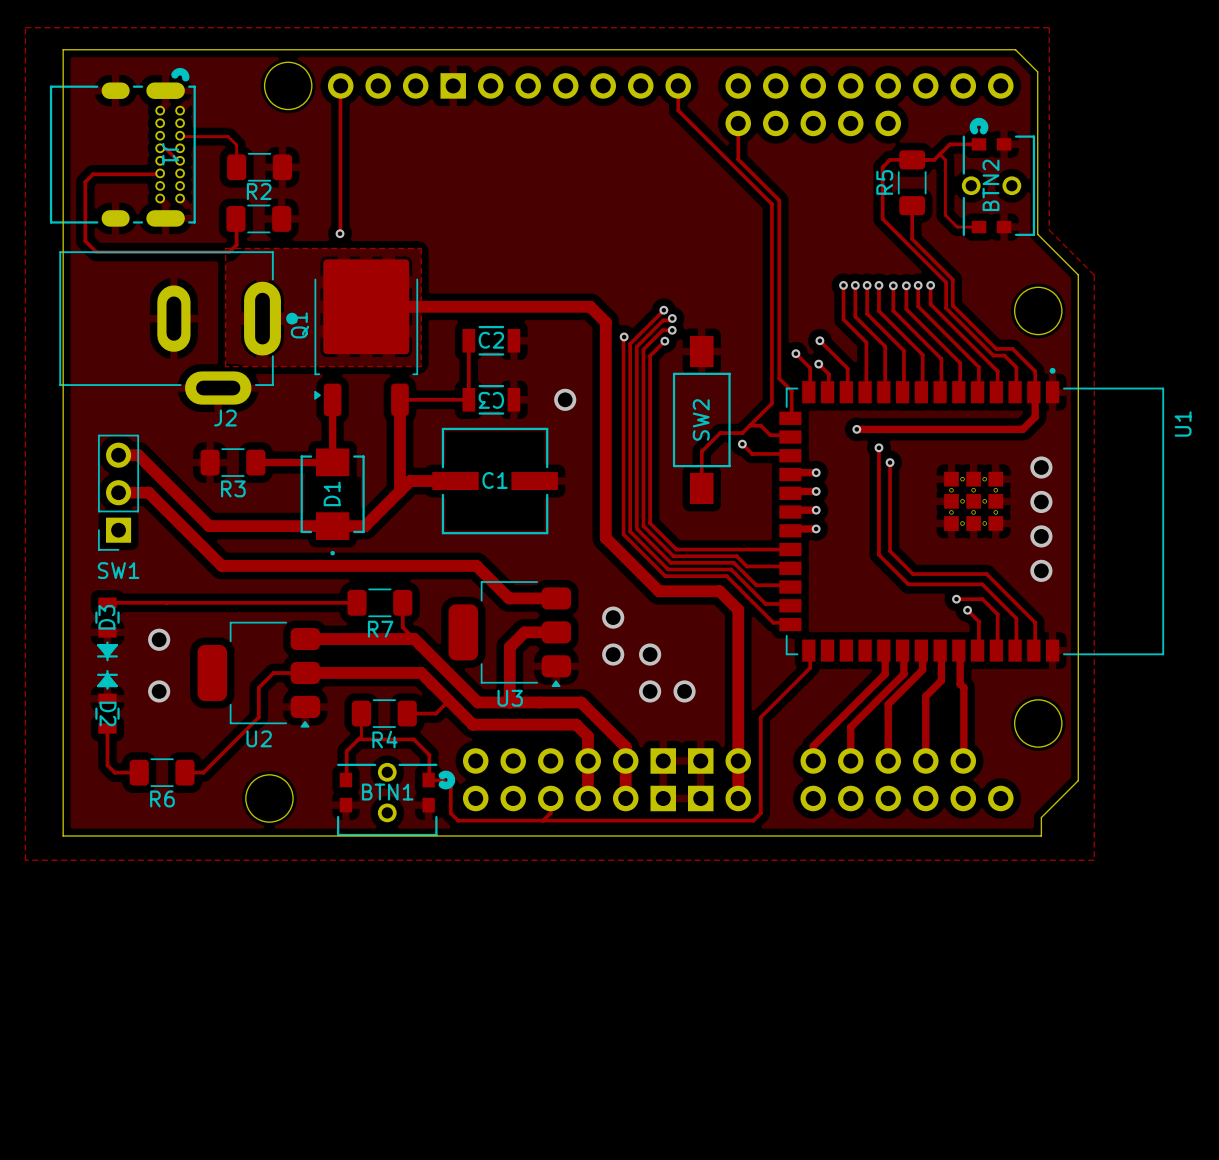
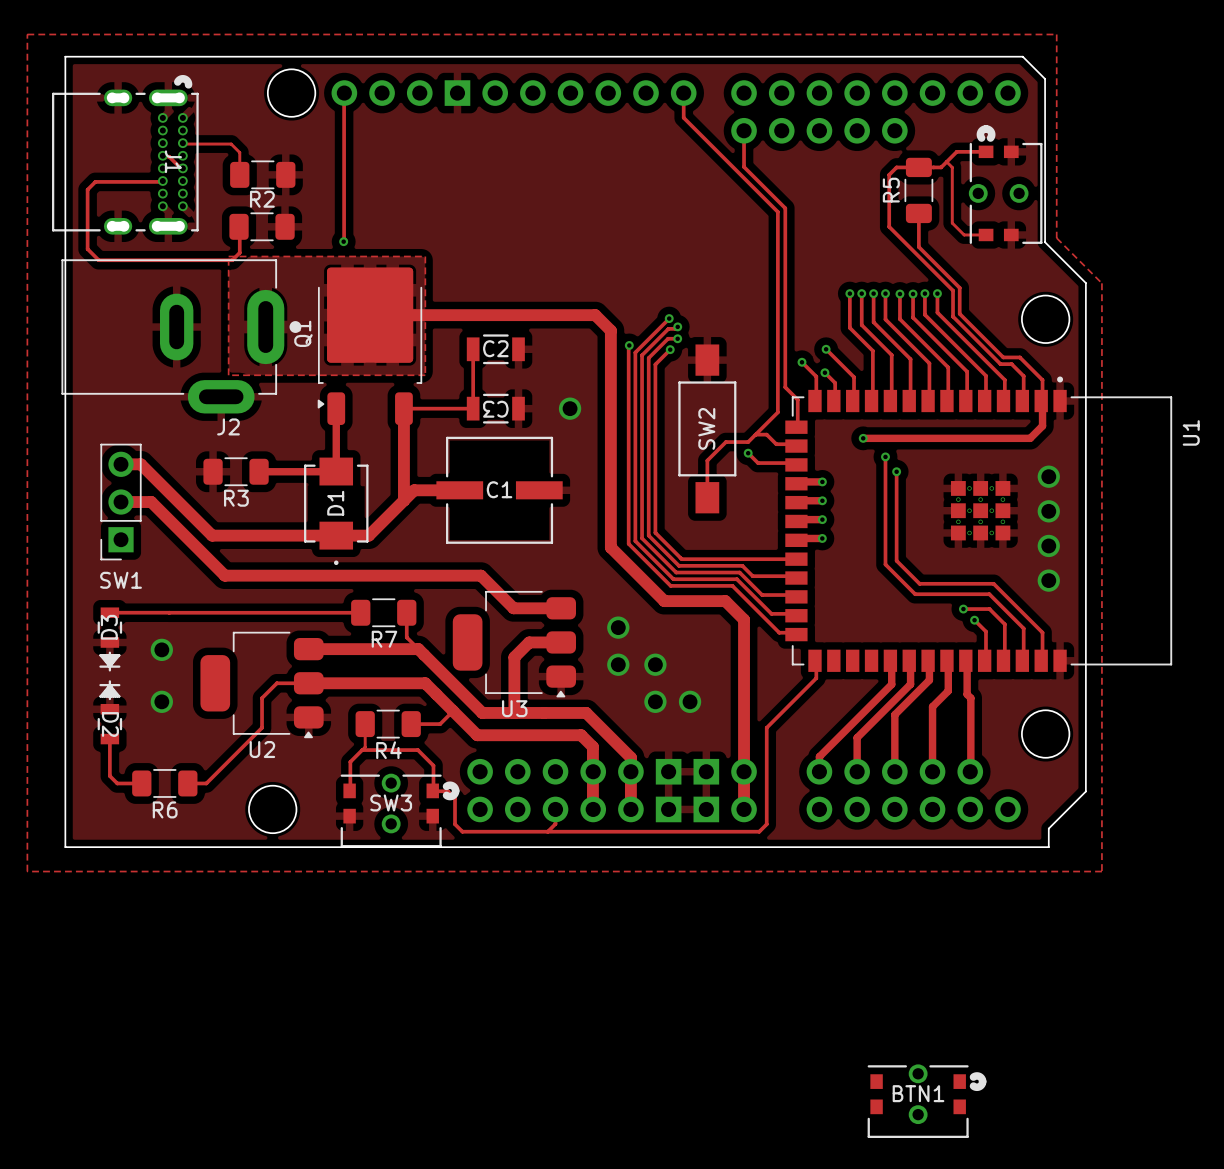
BTN2 name: BTN2 (991, 185) -> none
BTN1 name: BTN1 (387, 792) -> SW3 (391, 802)
BTN1: none -> (927, 1101)

